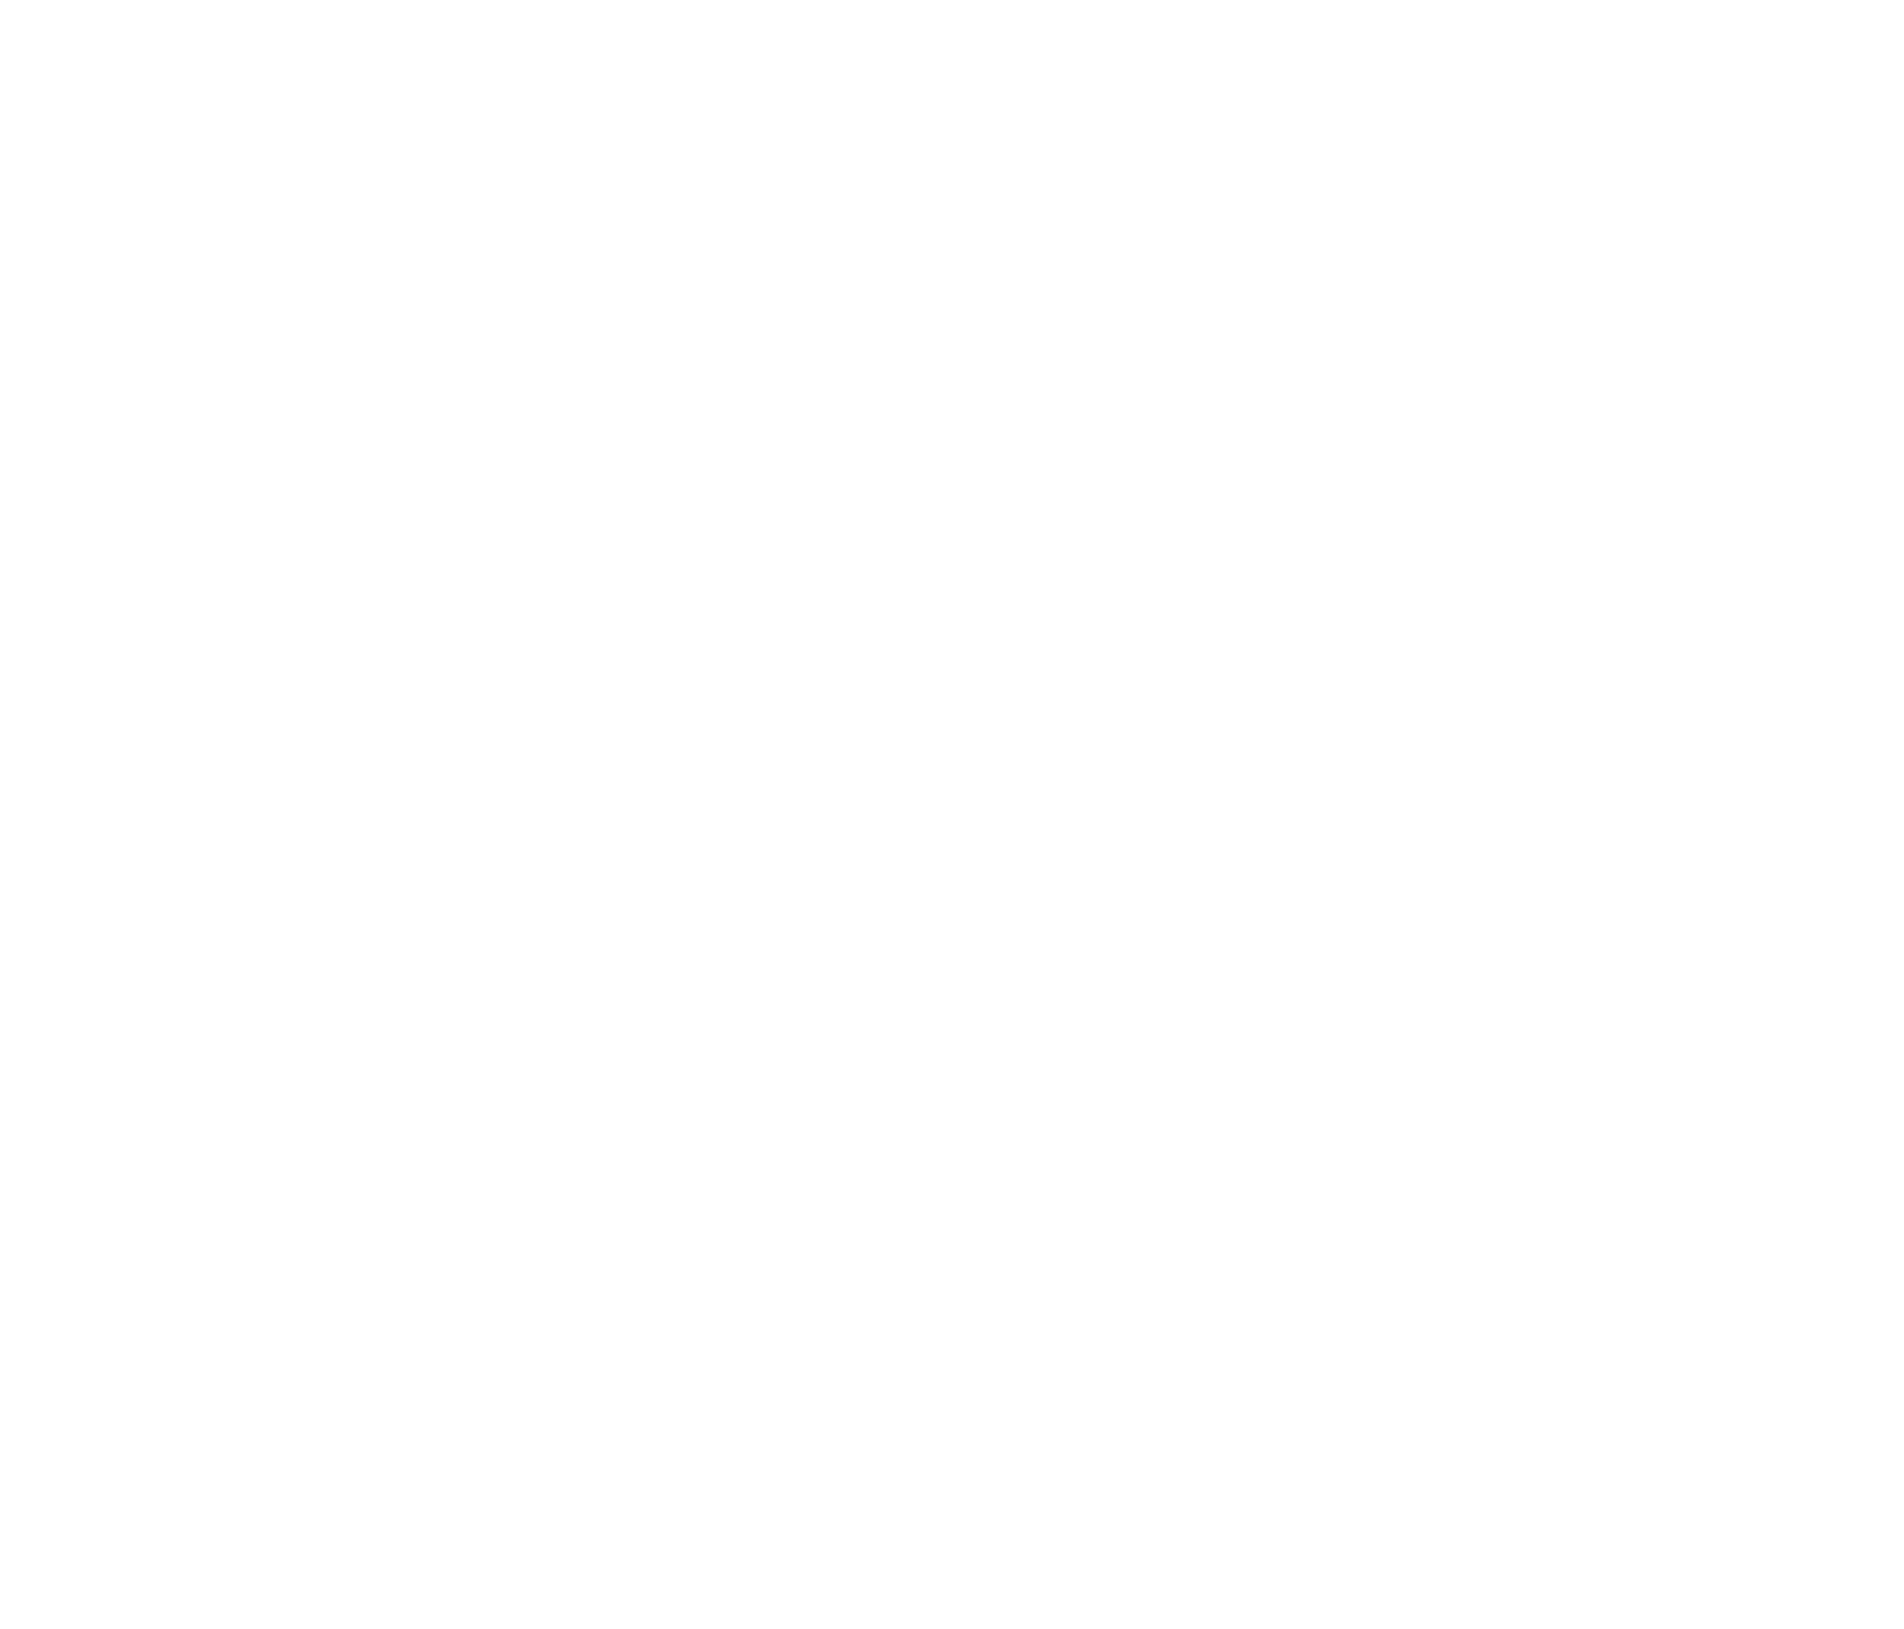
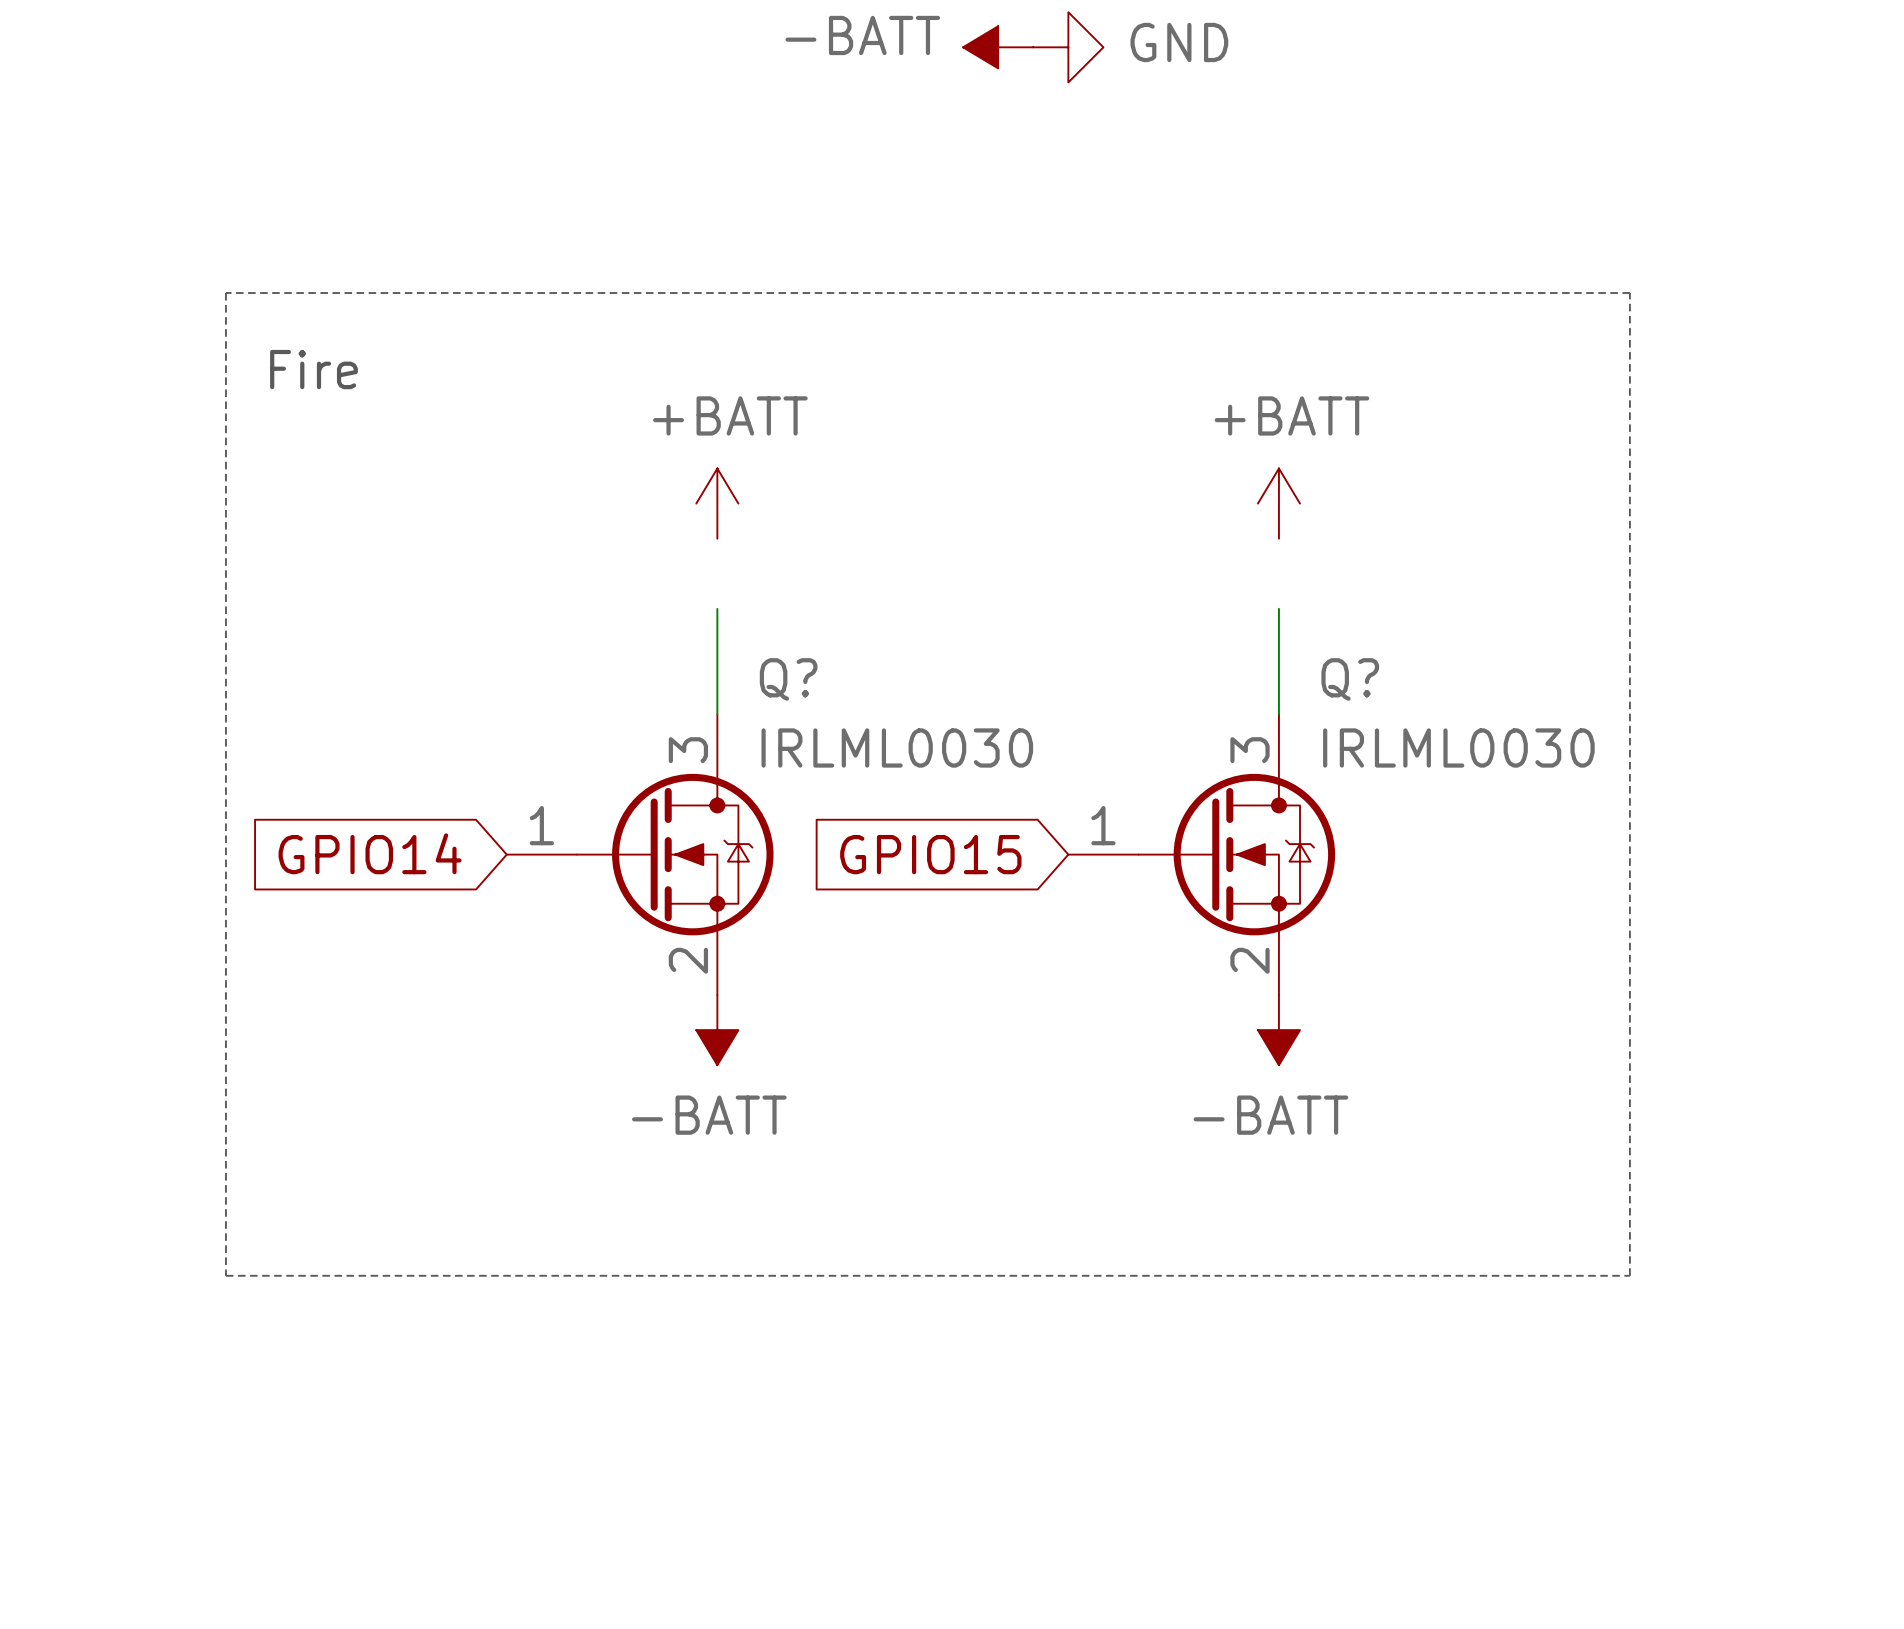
power symbol: none -> -BATT (998, 47)
power symbol: none -> GND (1068, 47)
line: none -> (225, 293) (225, 1275) (1629, 1275) (1629, 293) (225, 293)
text: none -> Fire (313, 369)
power symbol: none -> +BATT (717, 503)
power symbol: none -> +BATT (1278, 503)
wire: none -> (717, 608) (717, 714)
wire: none -> (1278, 608) (1278, 714)
global label: none -> GPIO14 (370, 853)
Q?: none -> IRLML0030 (640, 854)
global label: none -> GPIO15 (930, 854)
Q?: none -> IRLML0030 (1201, 854)
power symbol: none -> -BATT (717, 1030)
power symbol: none -> -BATT (1278, 1030)

